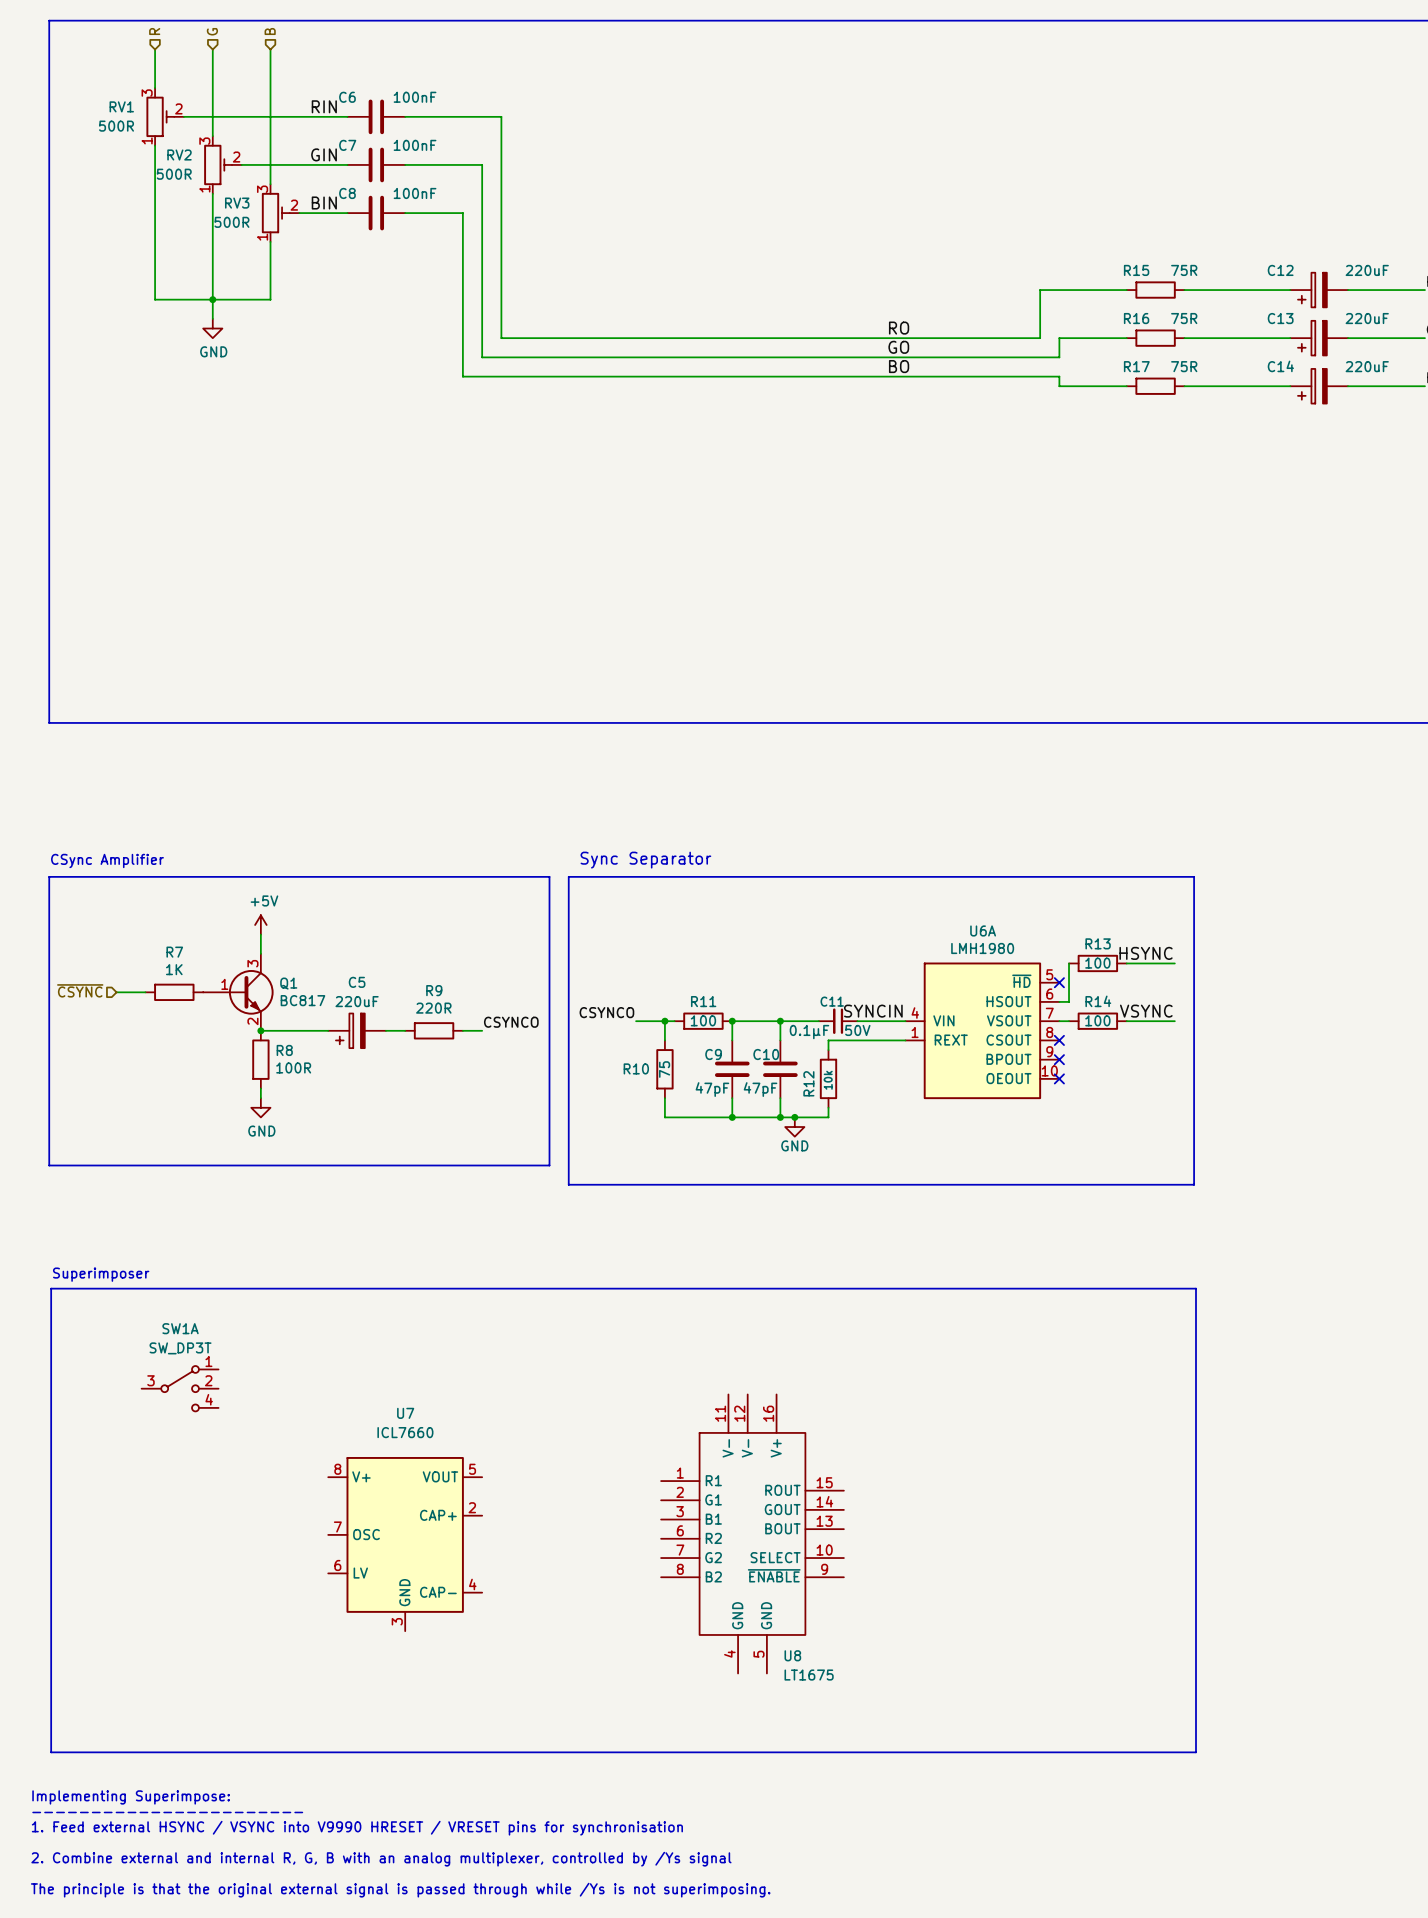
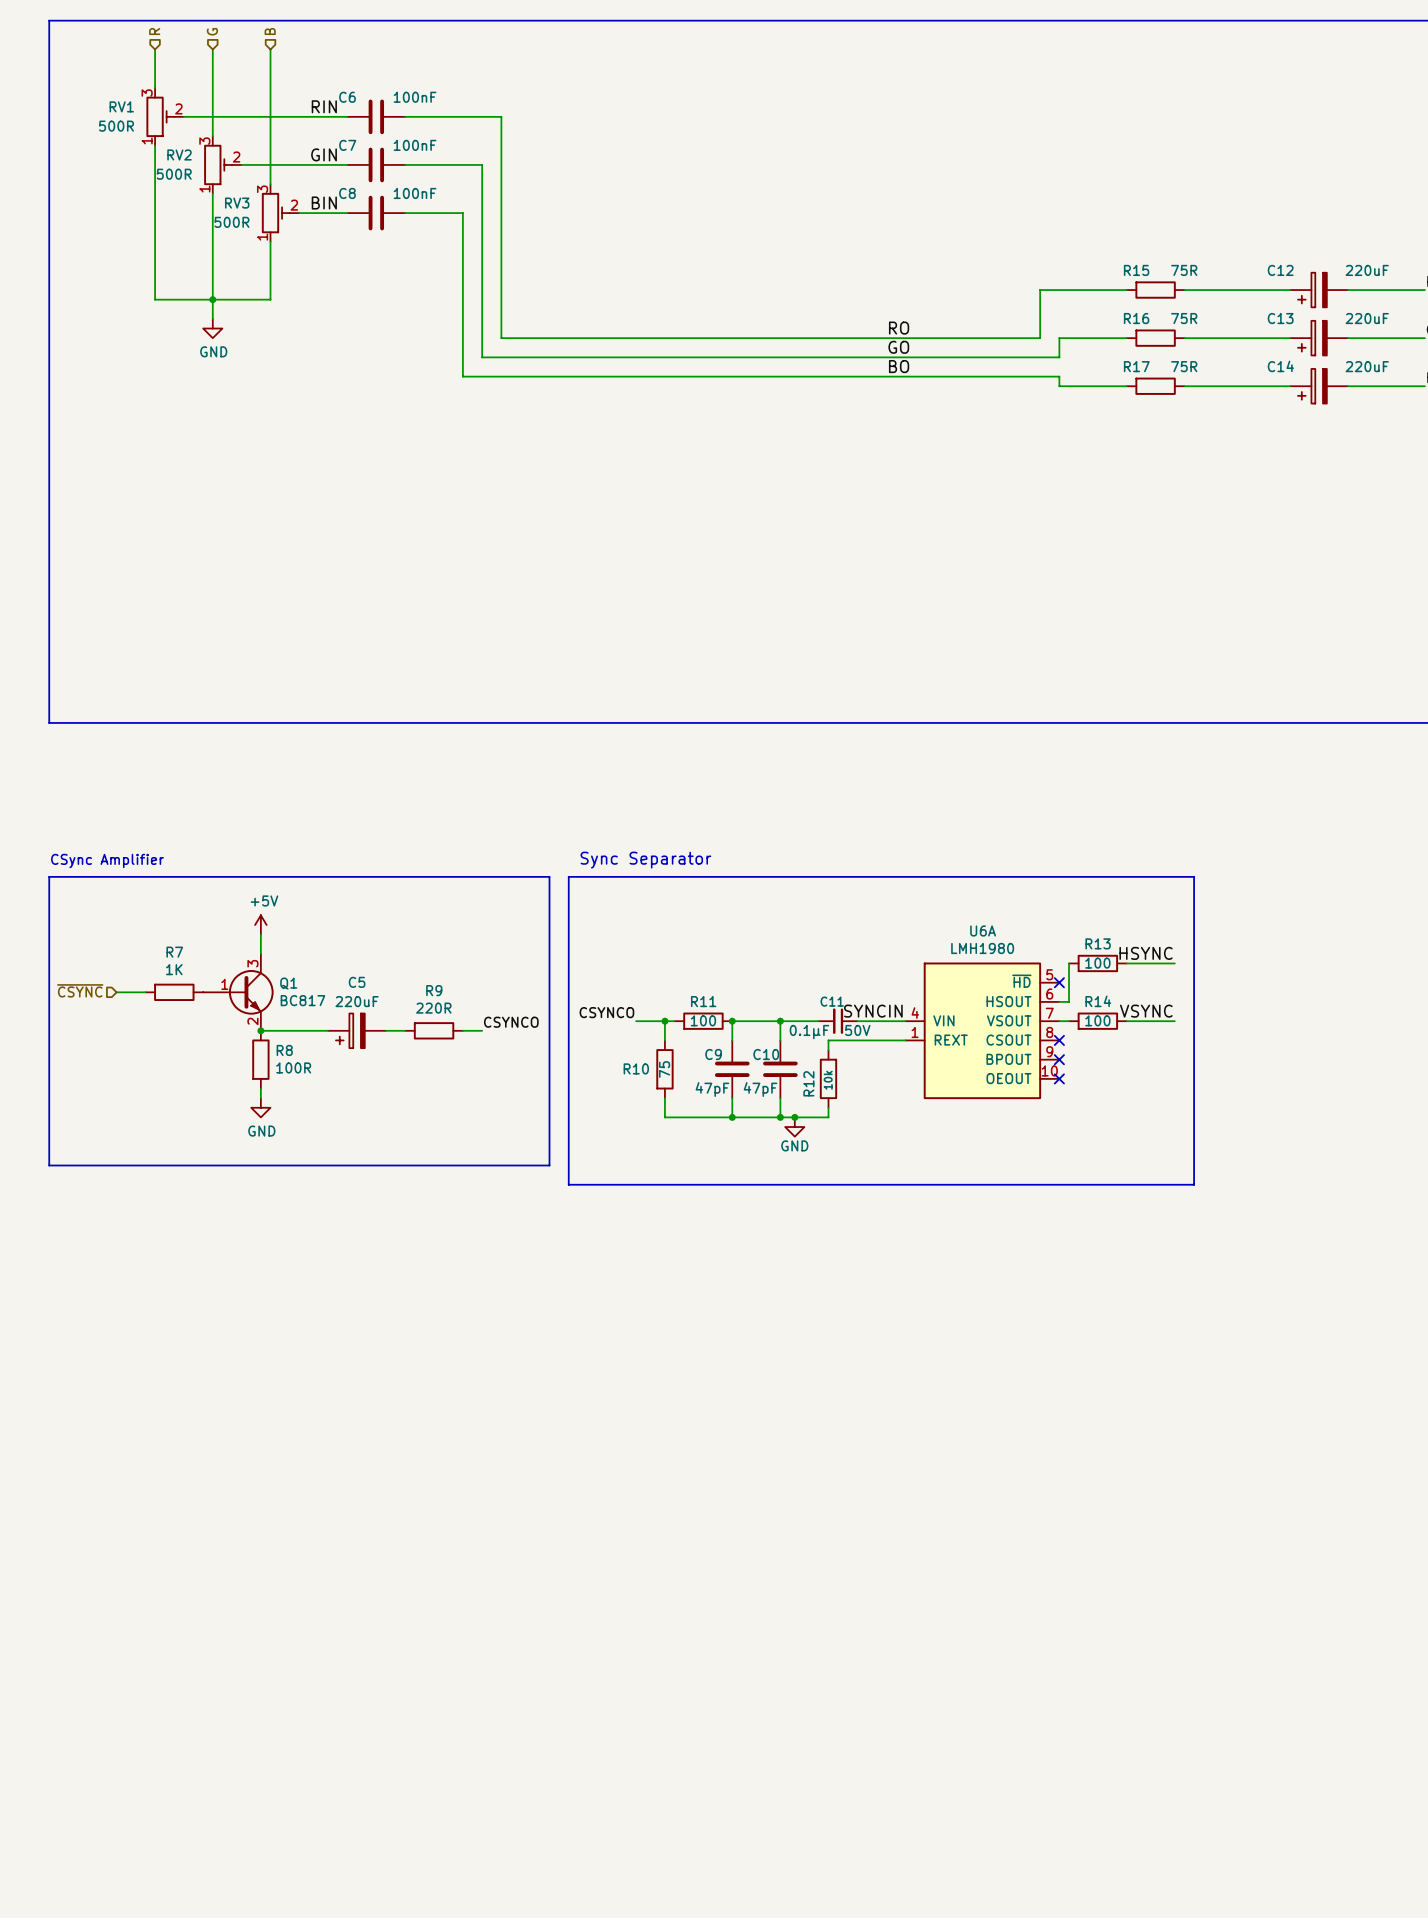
text: Superimposer (101, 1274) -> none
line: (51, 1288) (1196, 1288) (1196, 1752) (51, 1752) (51, 1288) -> none
SW1A: SW_DP3T (180, 1388) -> none
U8: LT1675 (752, 1533) -> none
U7: ICL7660 (405, 1544) -> none
text: Implementing Superimpose: (131, 1797) -> none
text: ----------------------- (167, 1812) -> none
text: 1. Feed external HSYNC / VSYNC into V9990 HRESET / VRESET pins for synchronisation (357, 1828) -> none
text: 2. Combine external and internal R, G, B with an analog multiplexer, controlled by /Ys signal (381, 1859) -> none
text: The principle is that the original external signal is passed through while /Ys is not superimposing. (400, 1890) -> none

